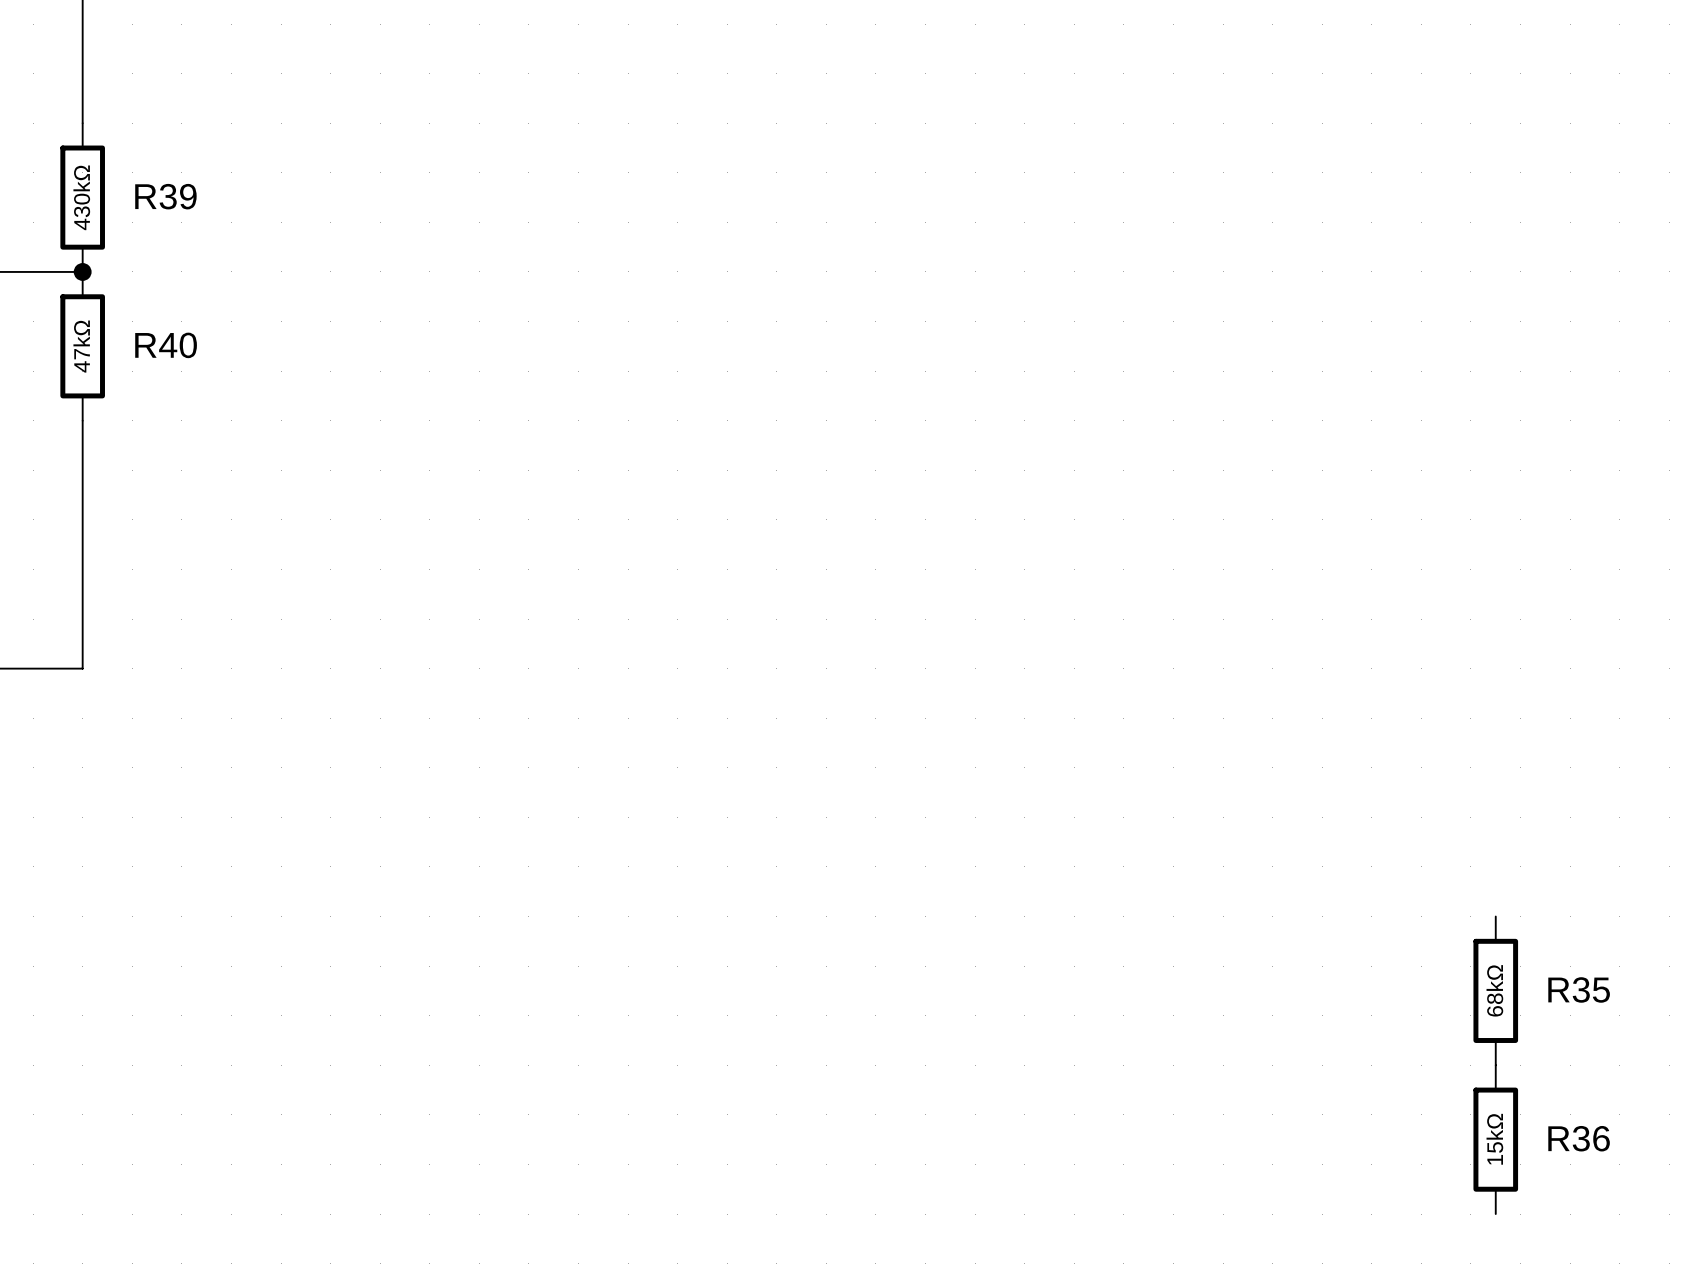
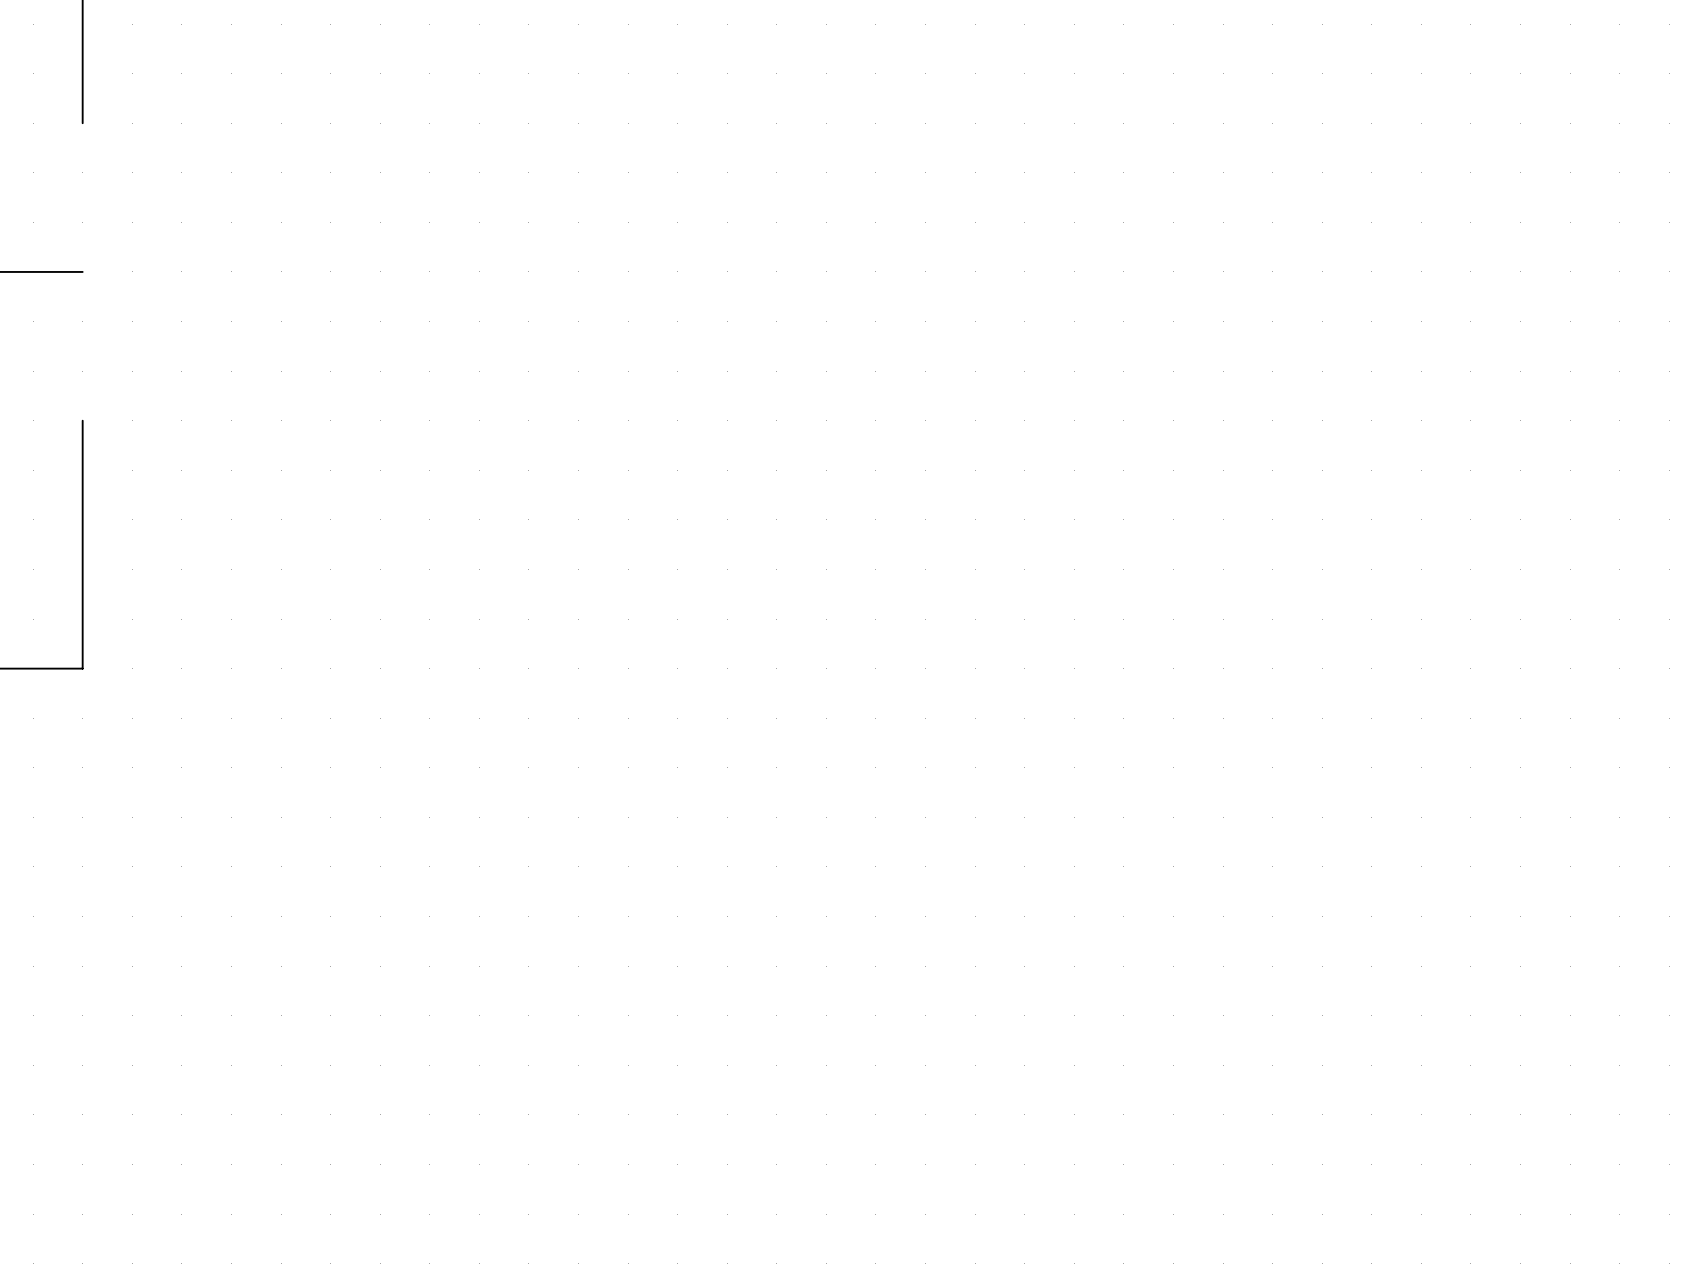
R39: 430kΩ (82, 197) -> none
junction: (82, 271) -> none
R40: 47kΩ (82, 346) -> none
R35: 68kΩ (1495, 990) -> none
R36: 15kΩ (1495, 1139) -> none

